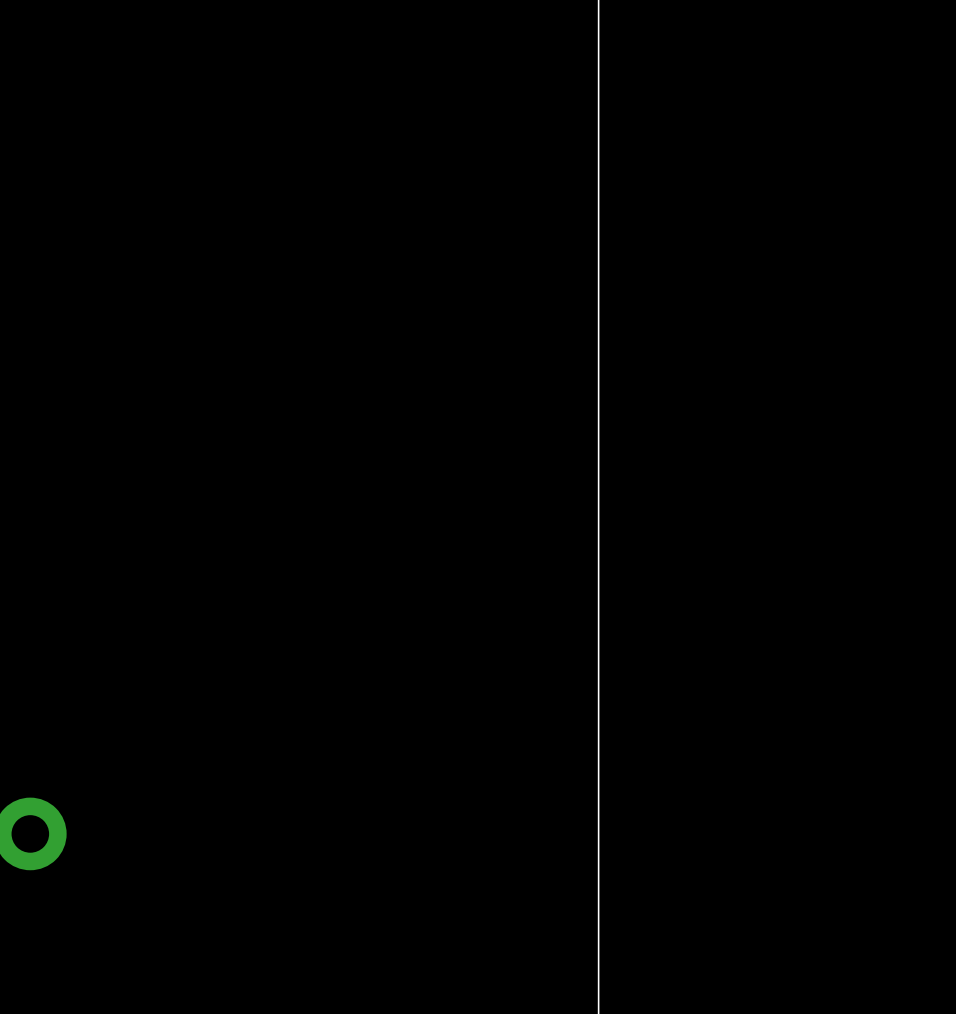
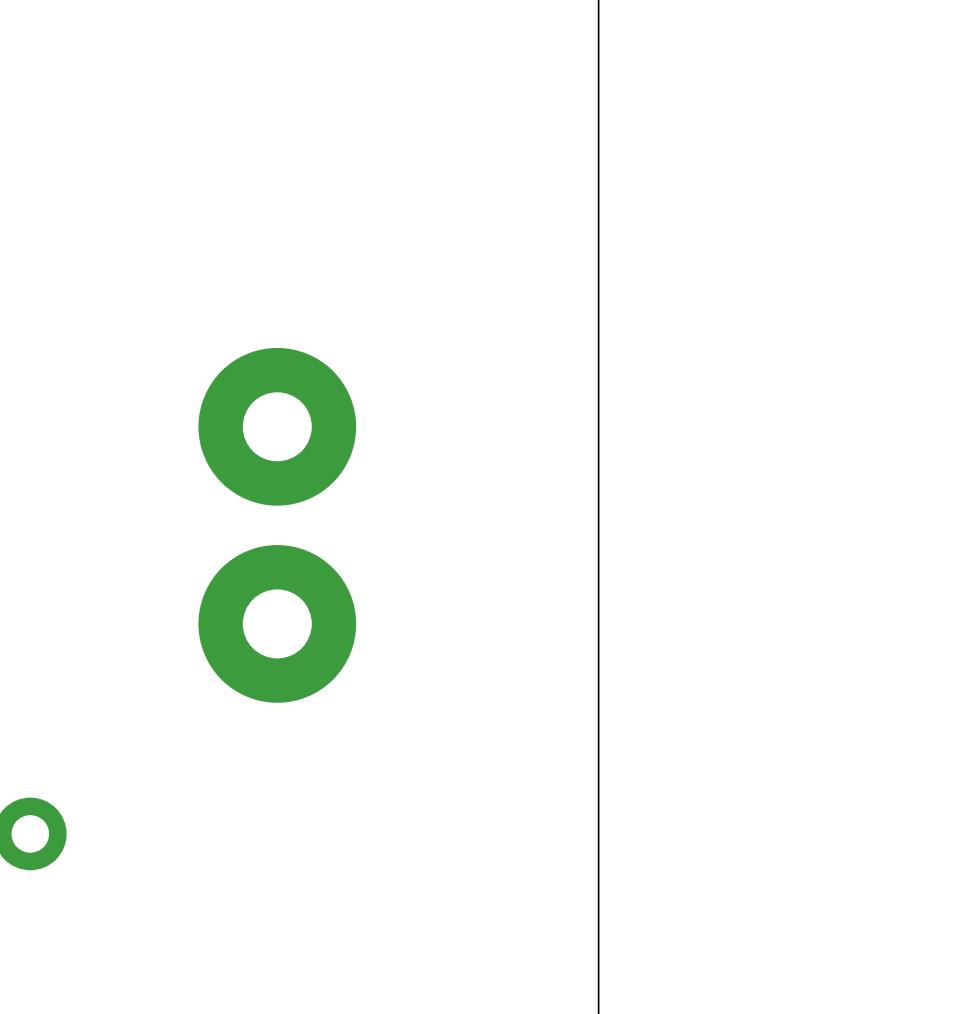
part: none -> (277, 525)

